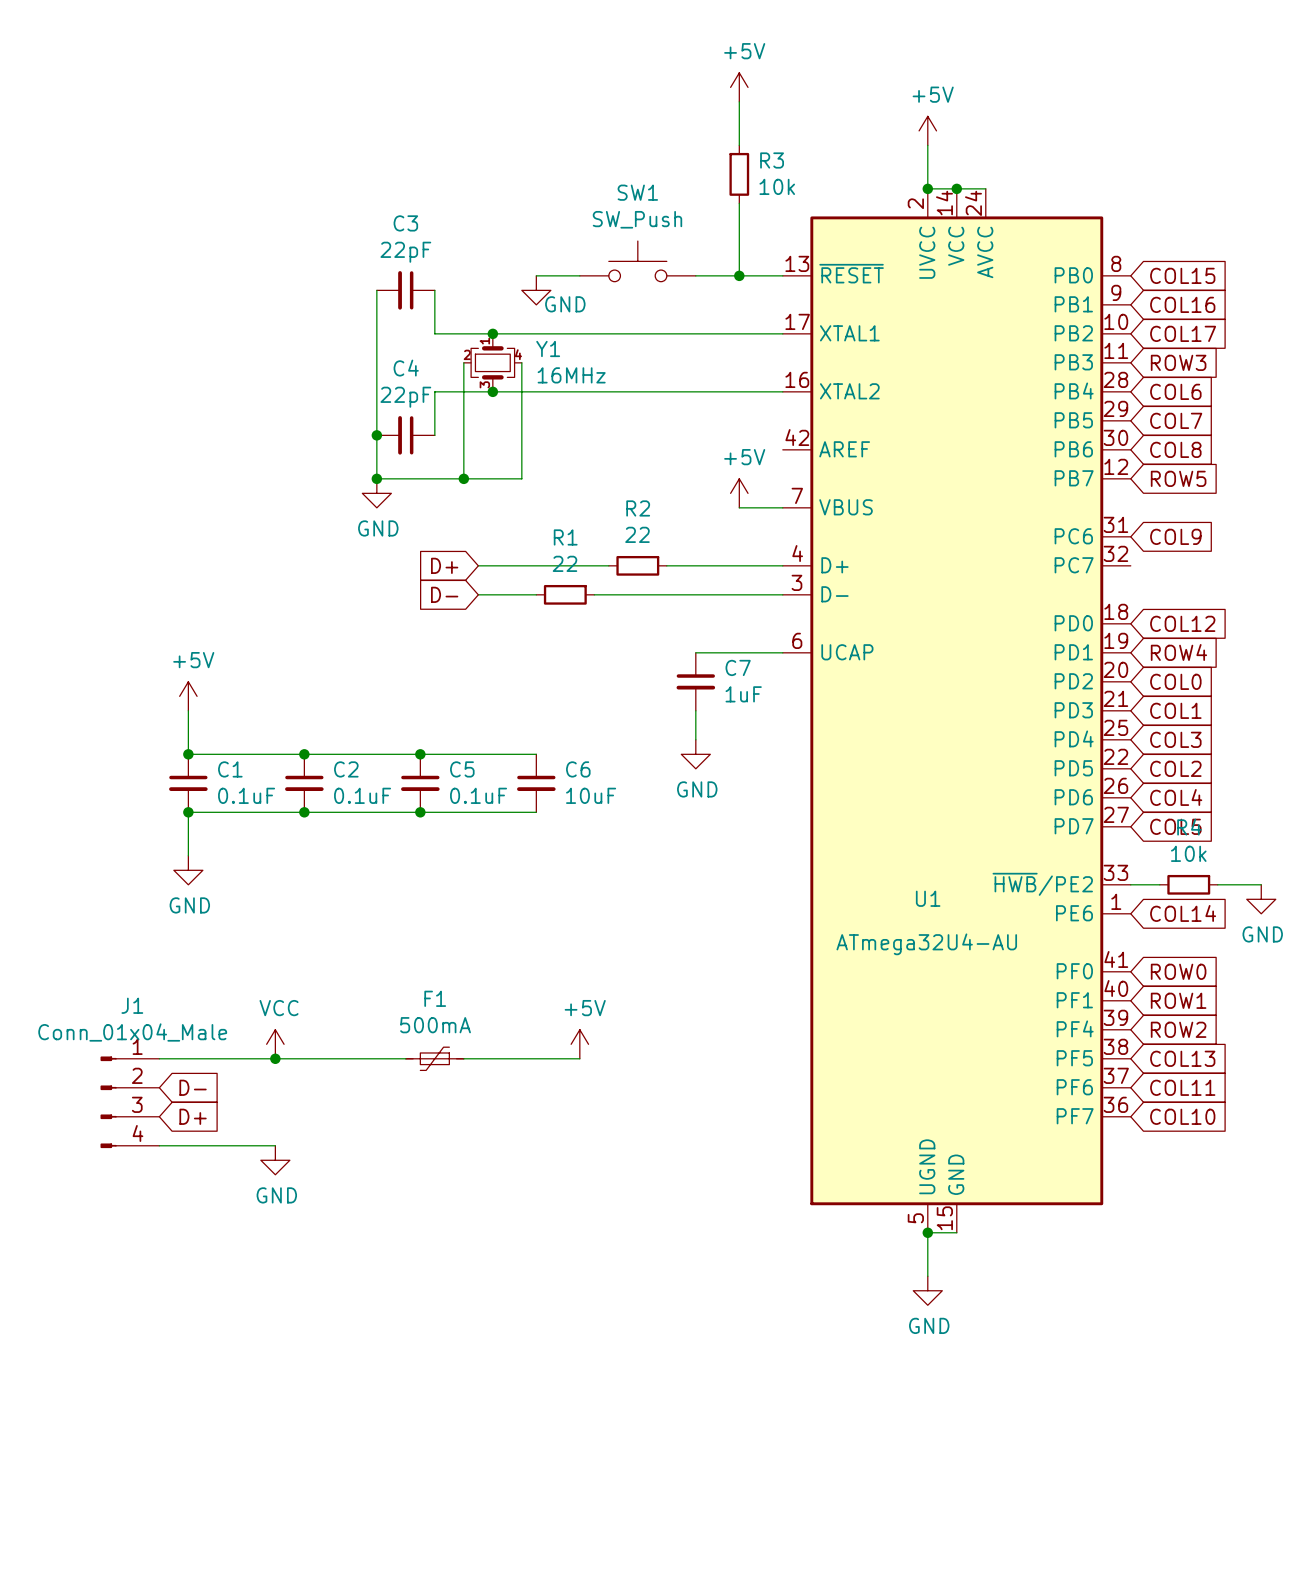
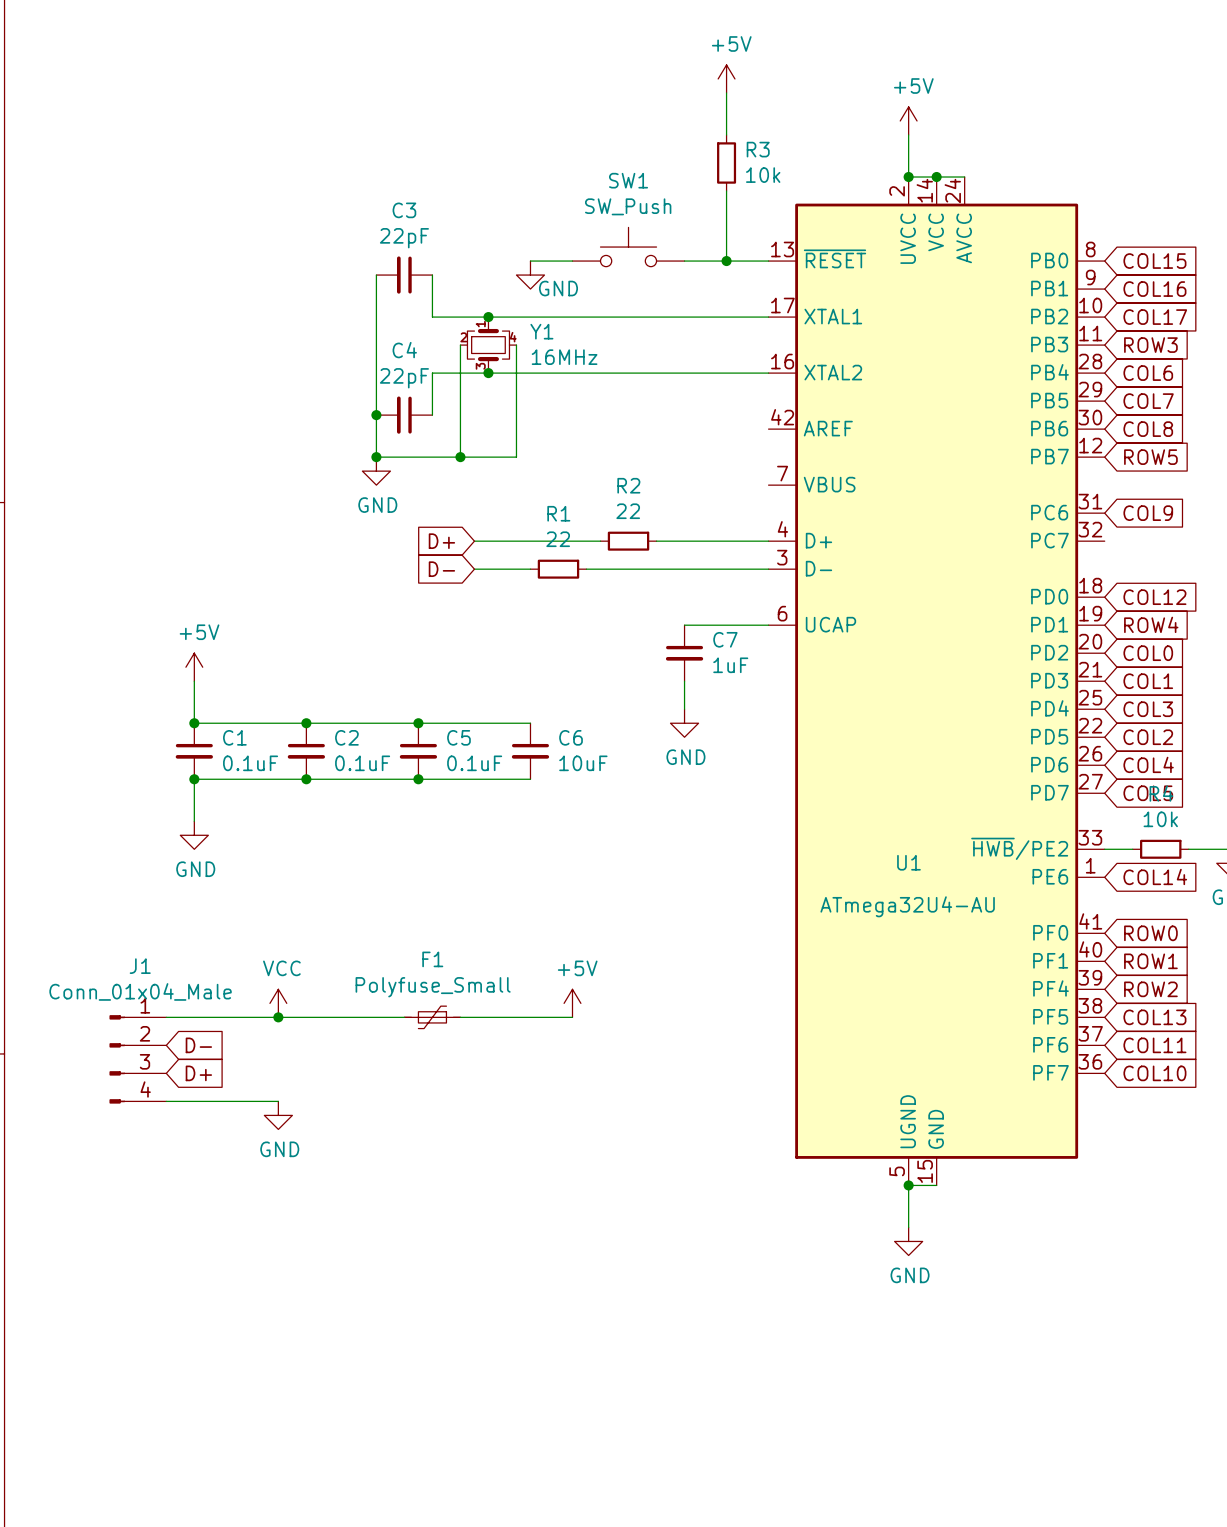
power symbol: +5V (739, 493) -> none
wire: (739, 507) (782, 507) -> none
F1 value: 500mA (435, 1025) -> Polyfuse_Small (433, 987)

